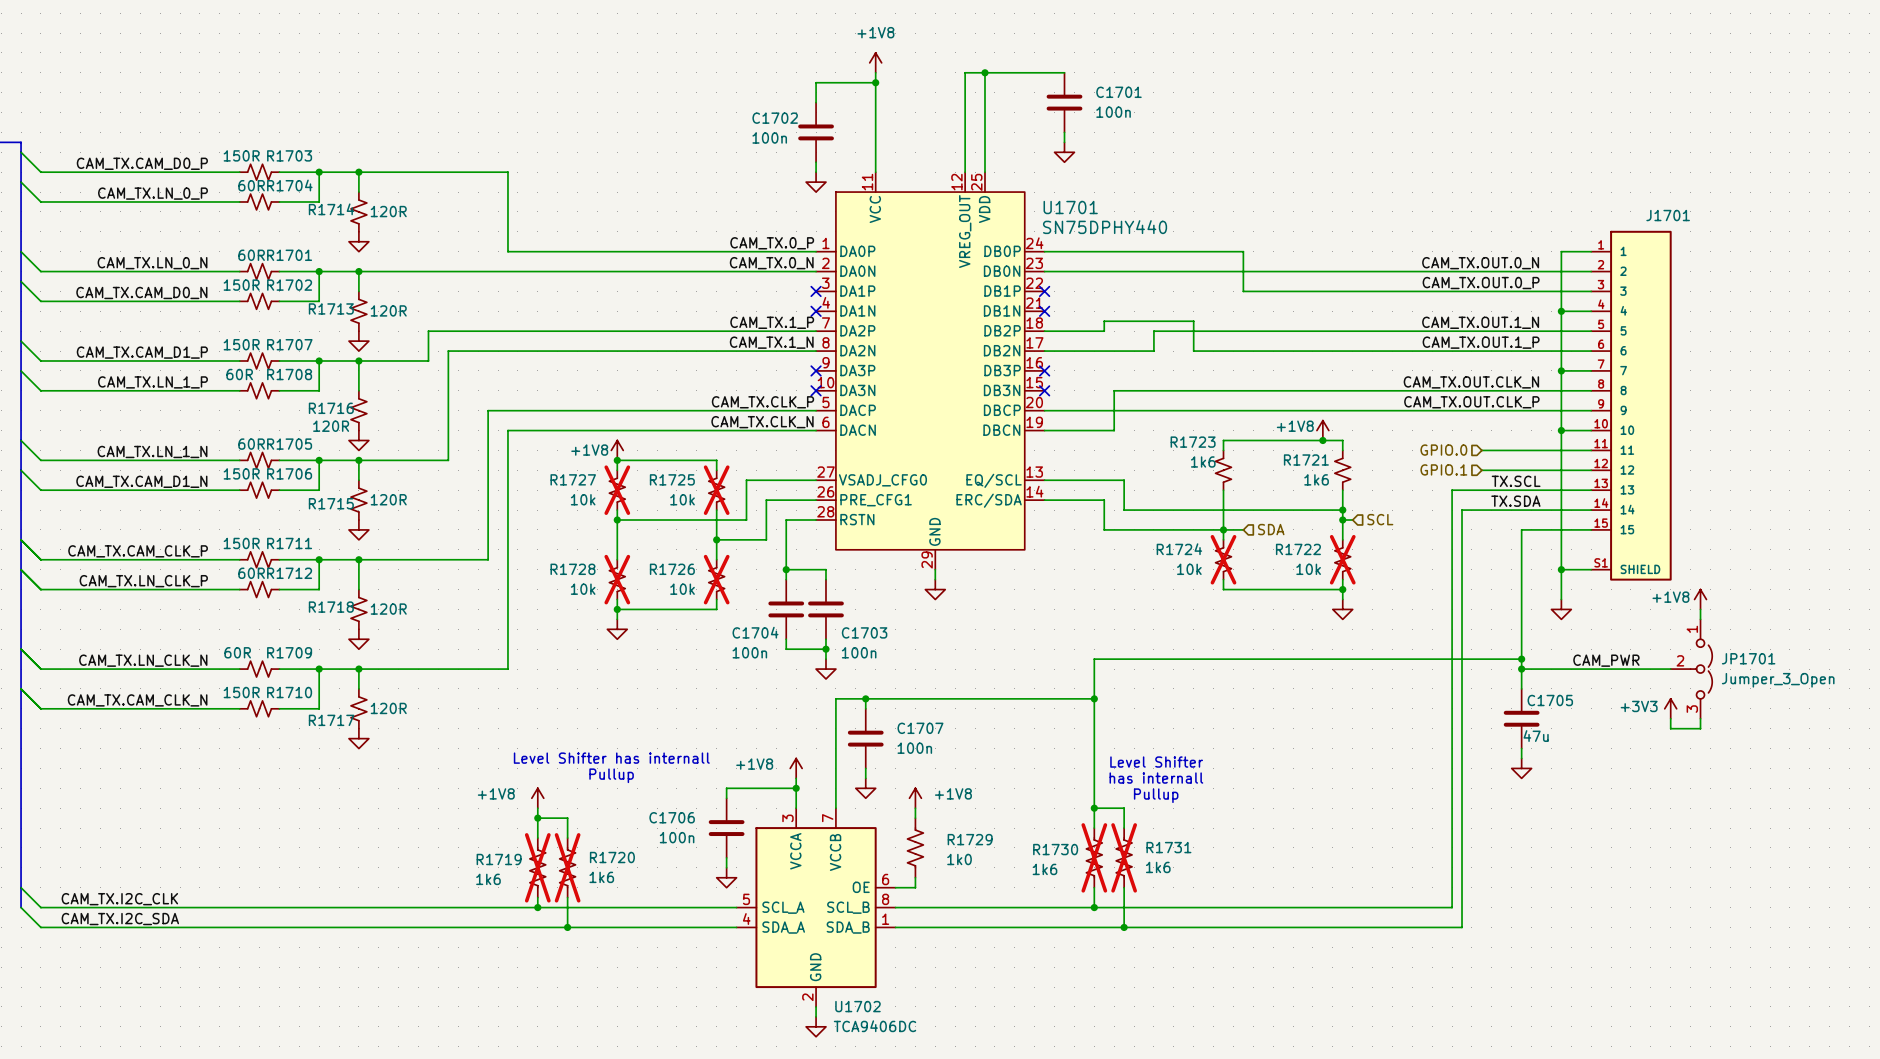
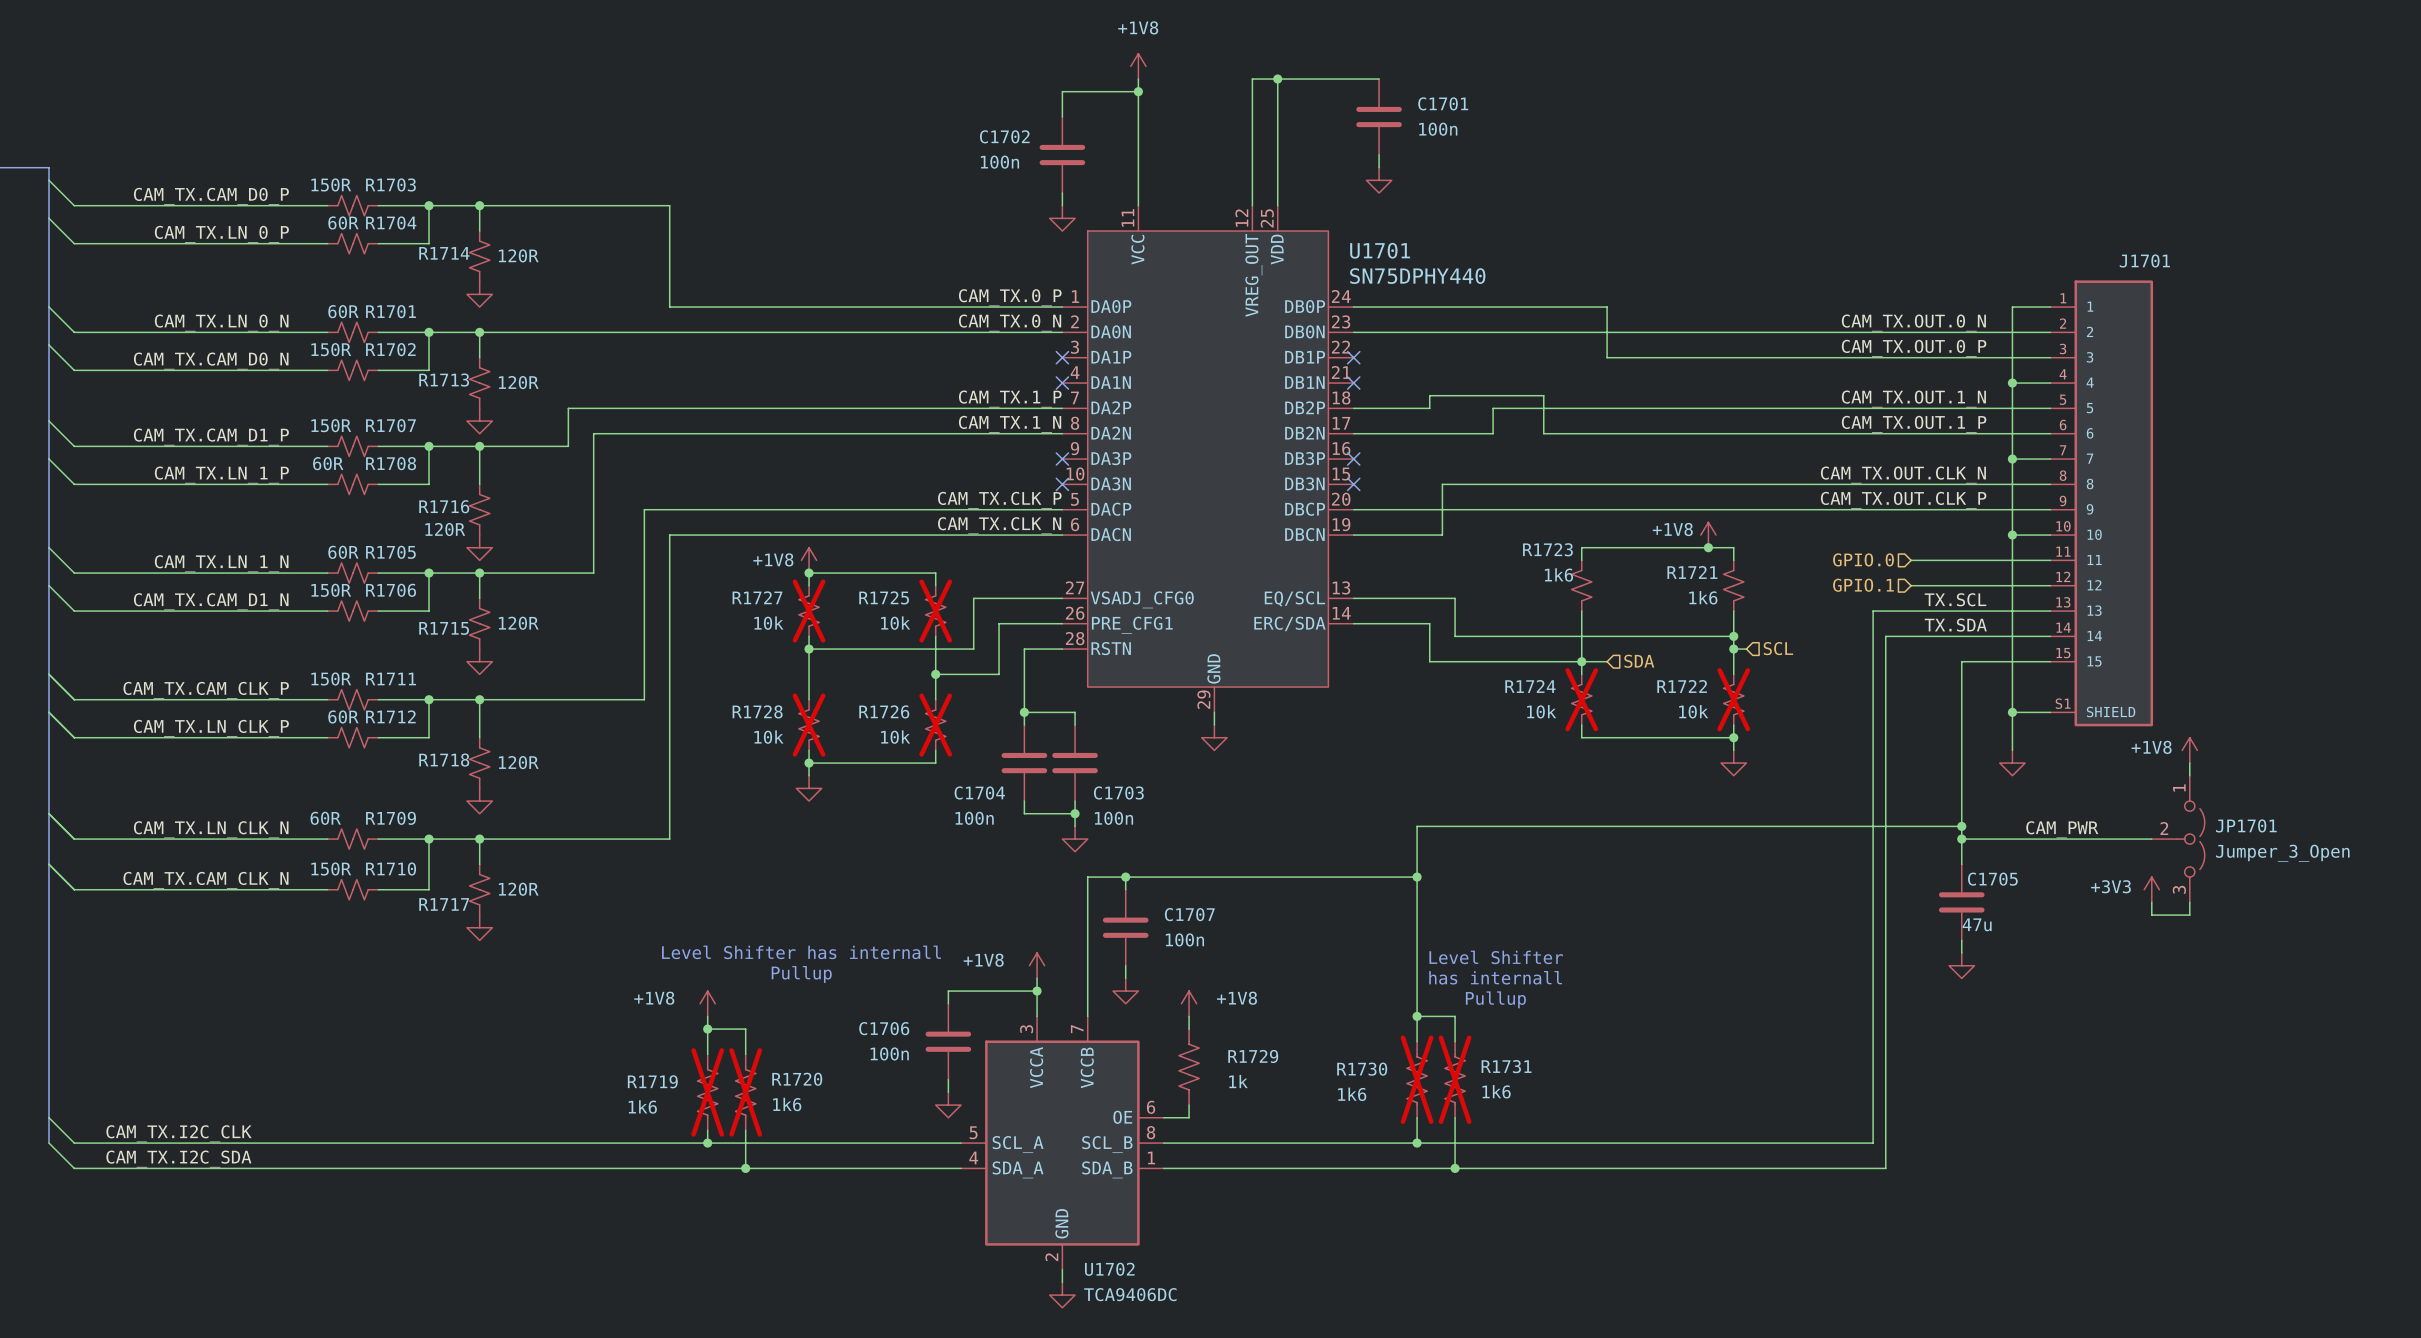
R1729 value: 1k0 (959, 859) -> 1k (1238, 1081)

